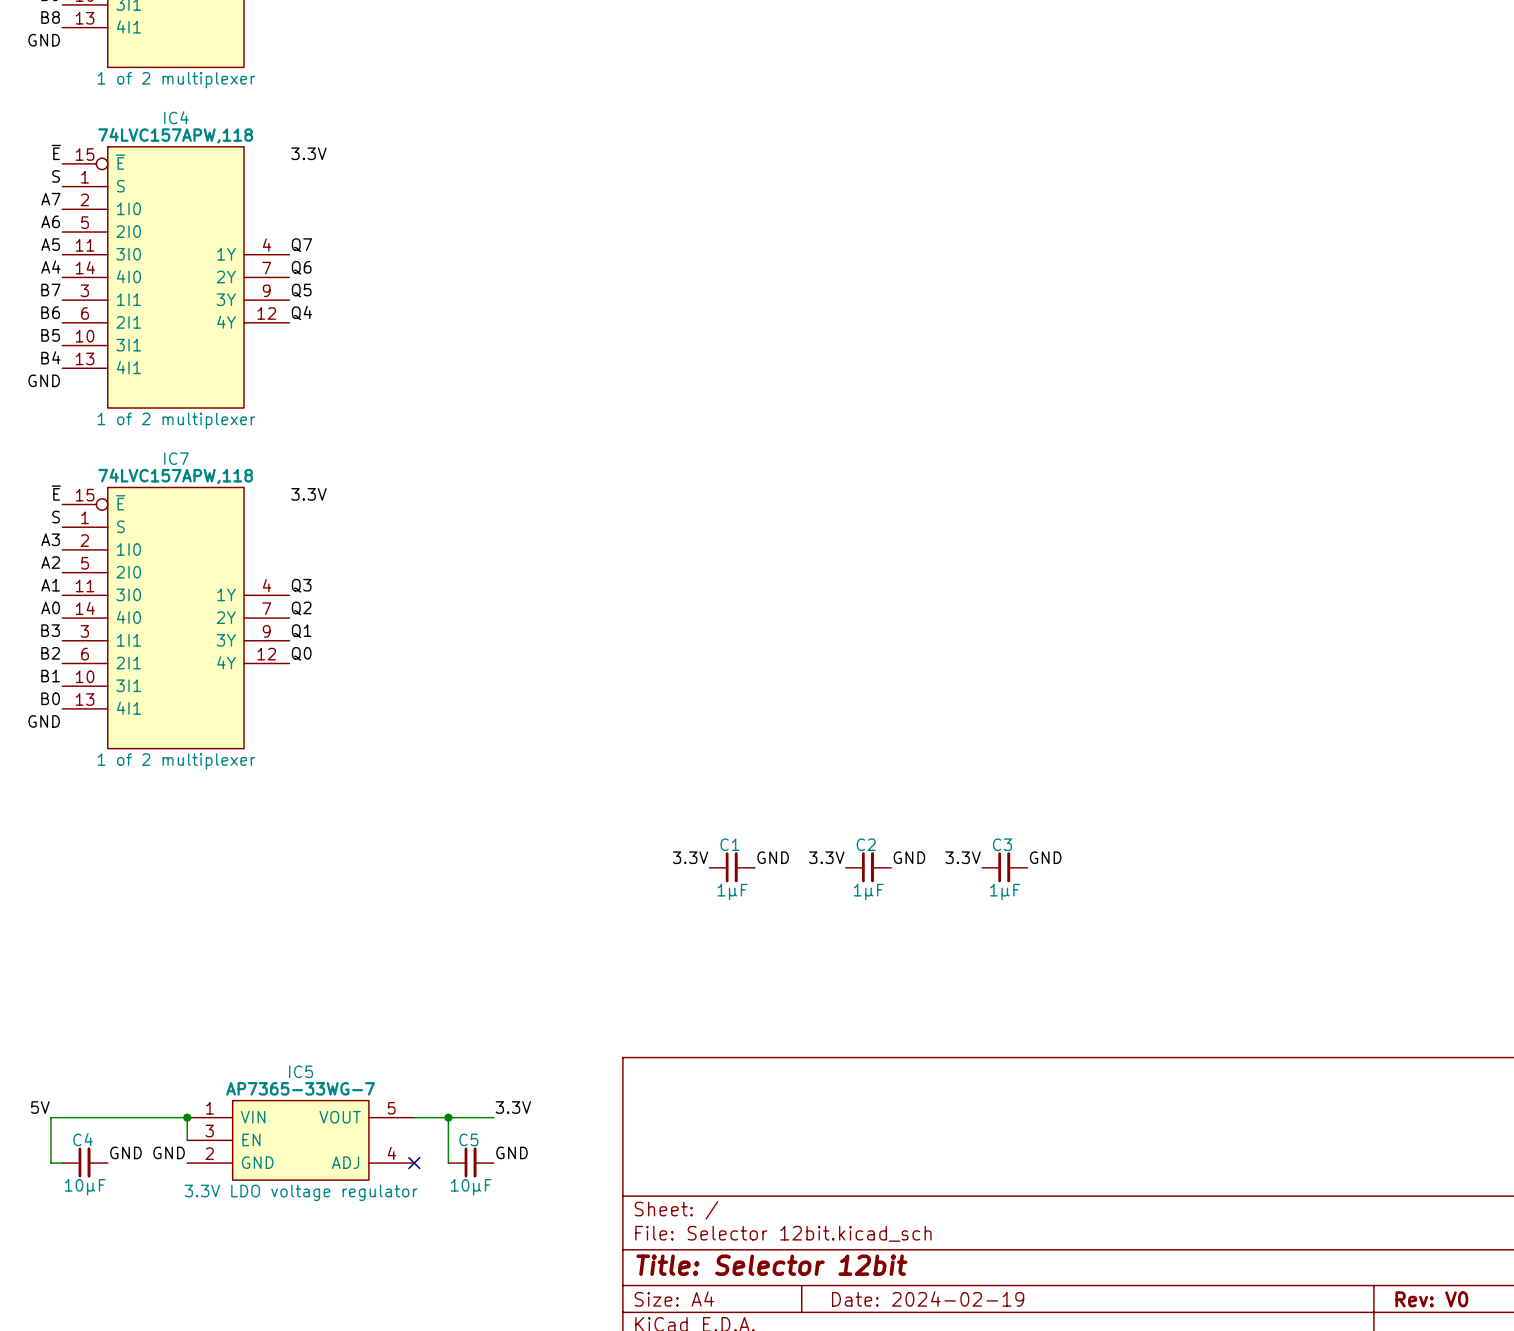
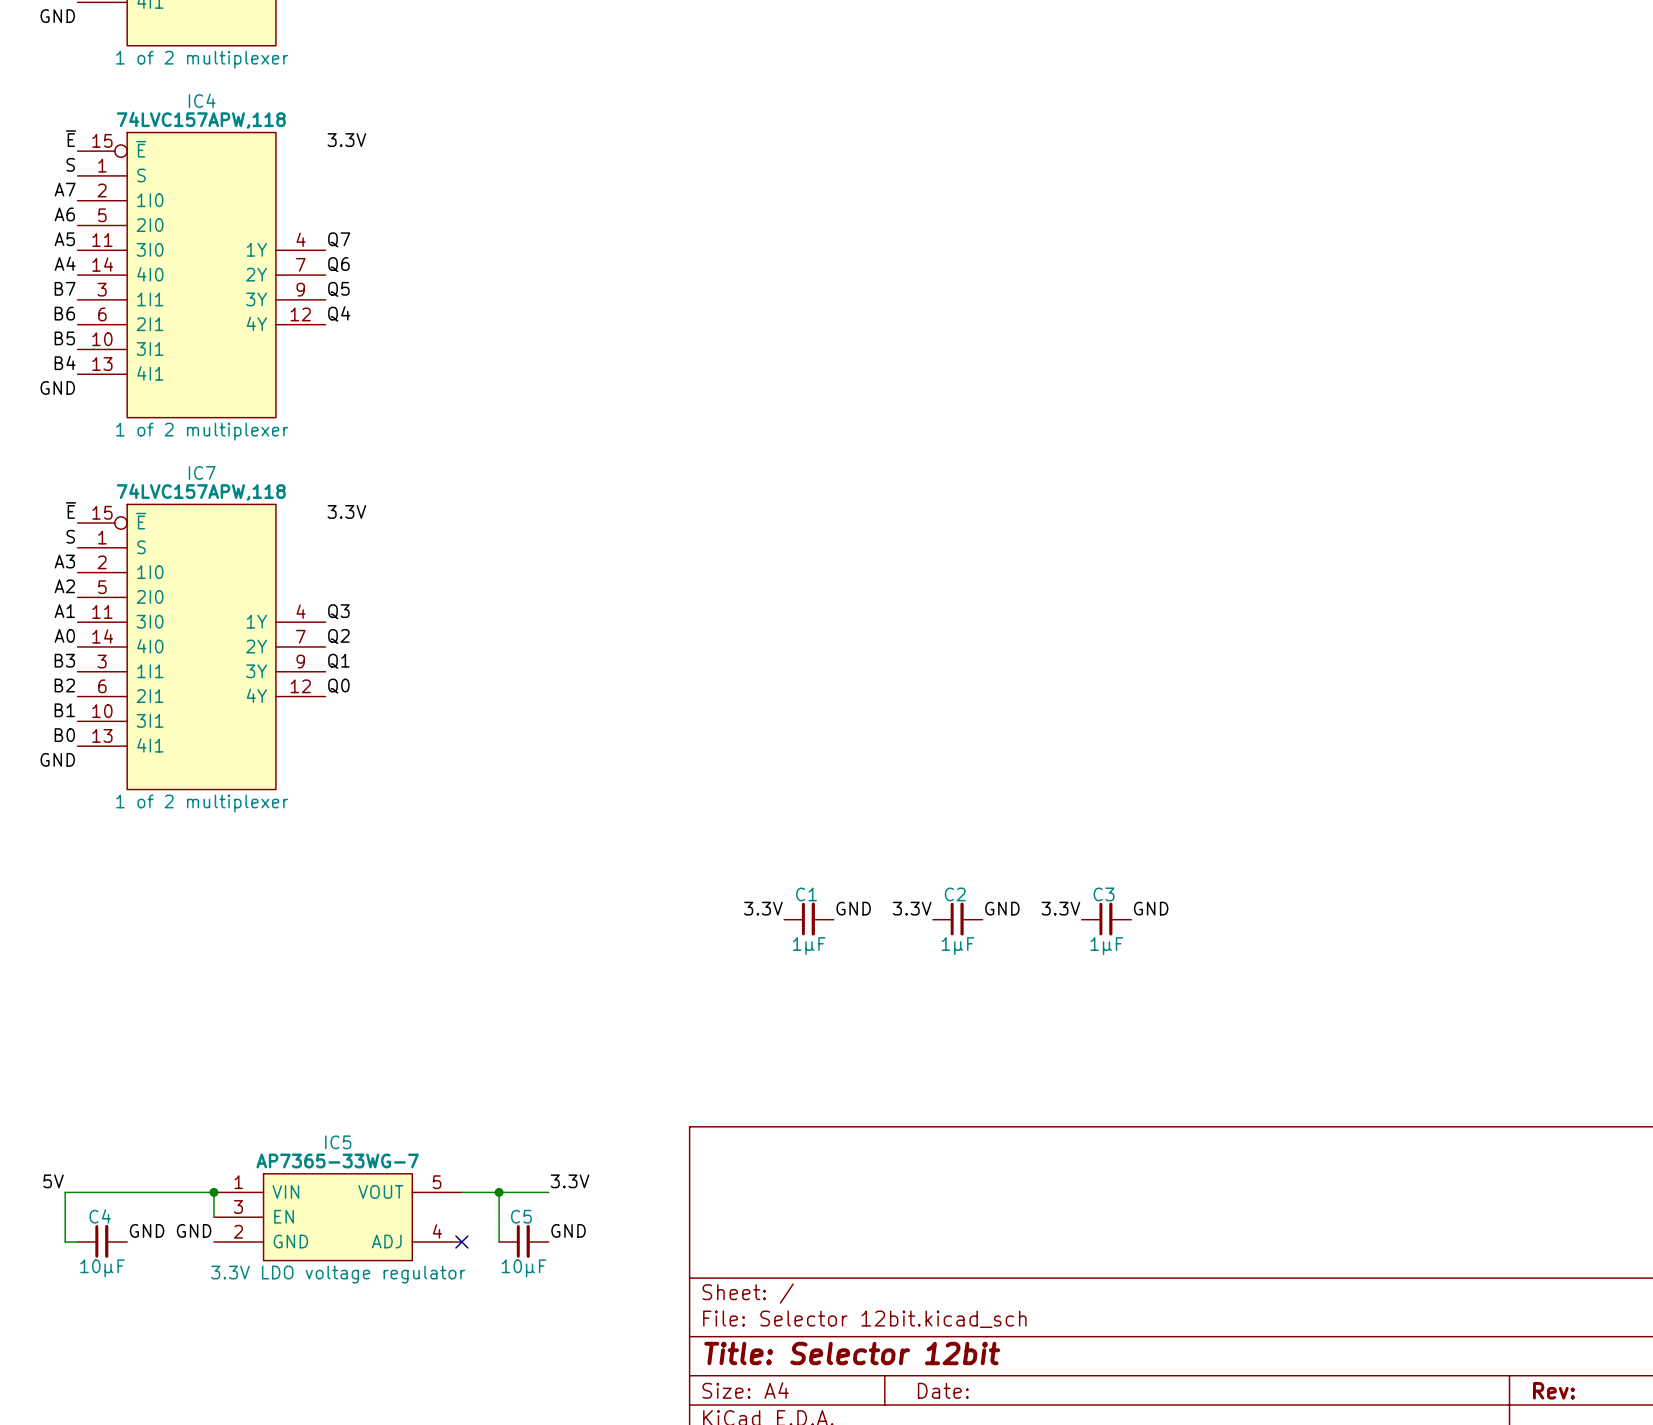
title block: Date: 2024-02-19 (928, 1299) -> Date: (943, 1390)
title block: Rev: V0 (1431, 1299) -> Rev: (1553, 1390)

